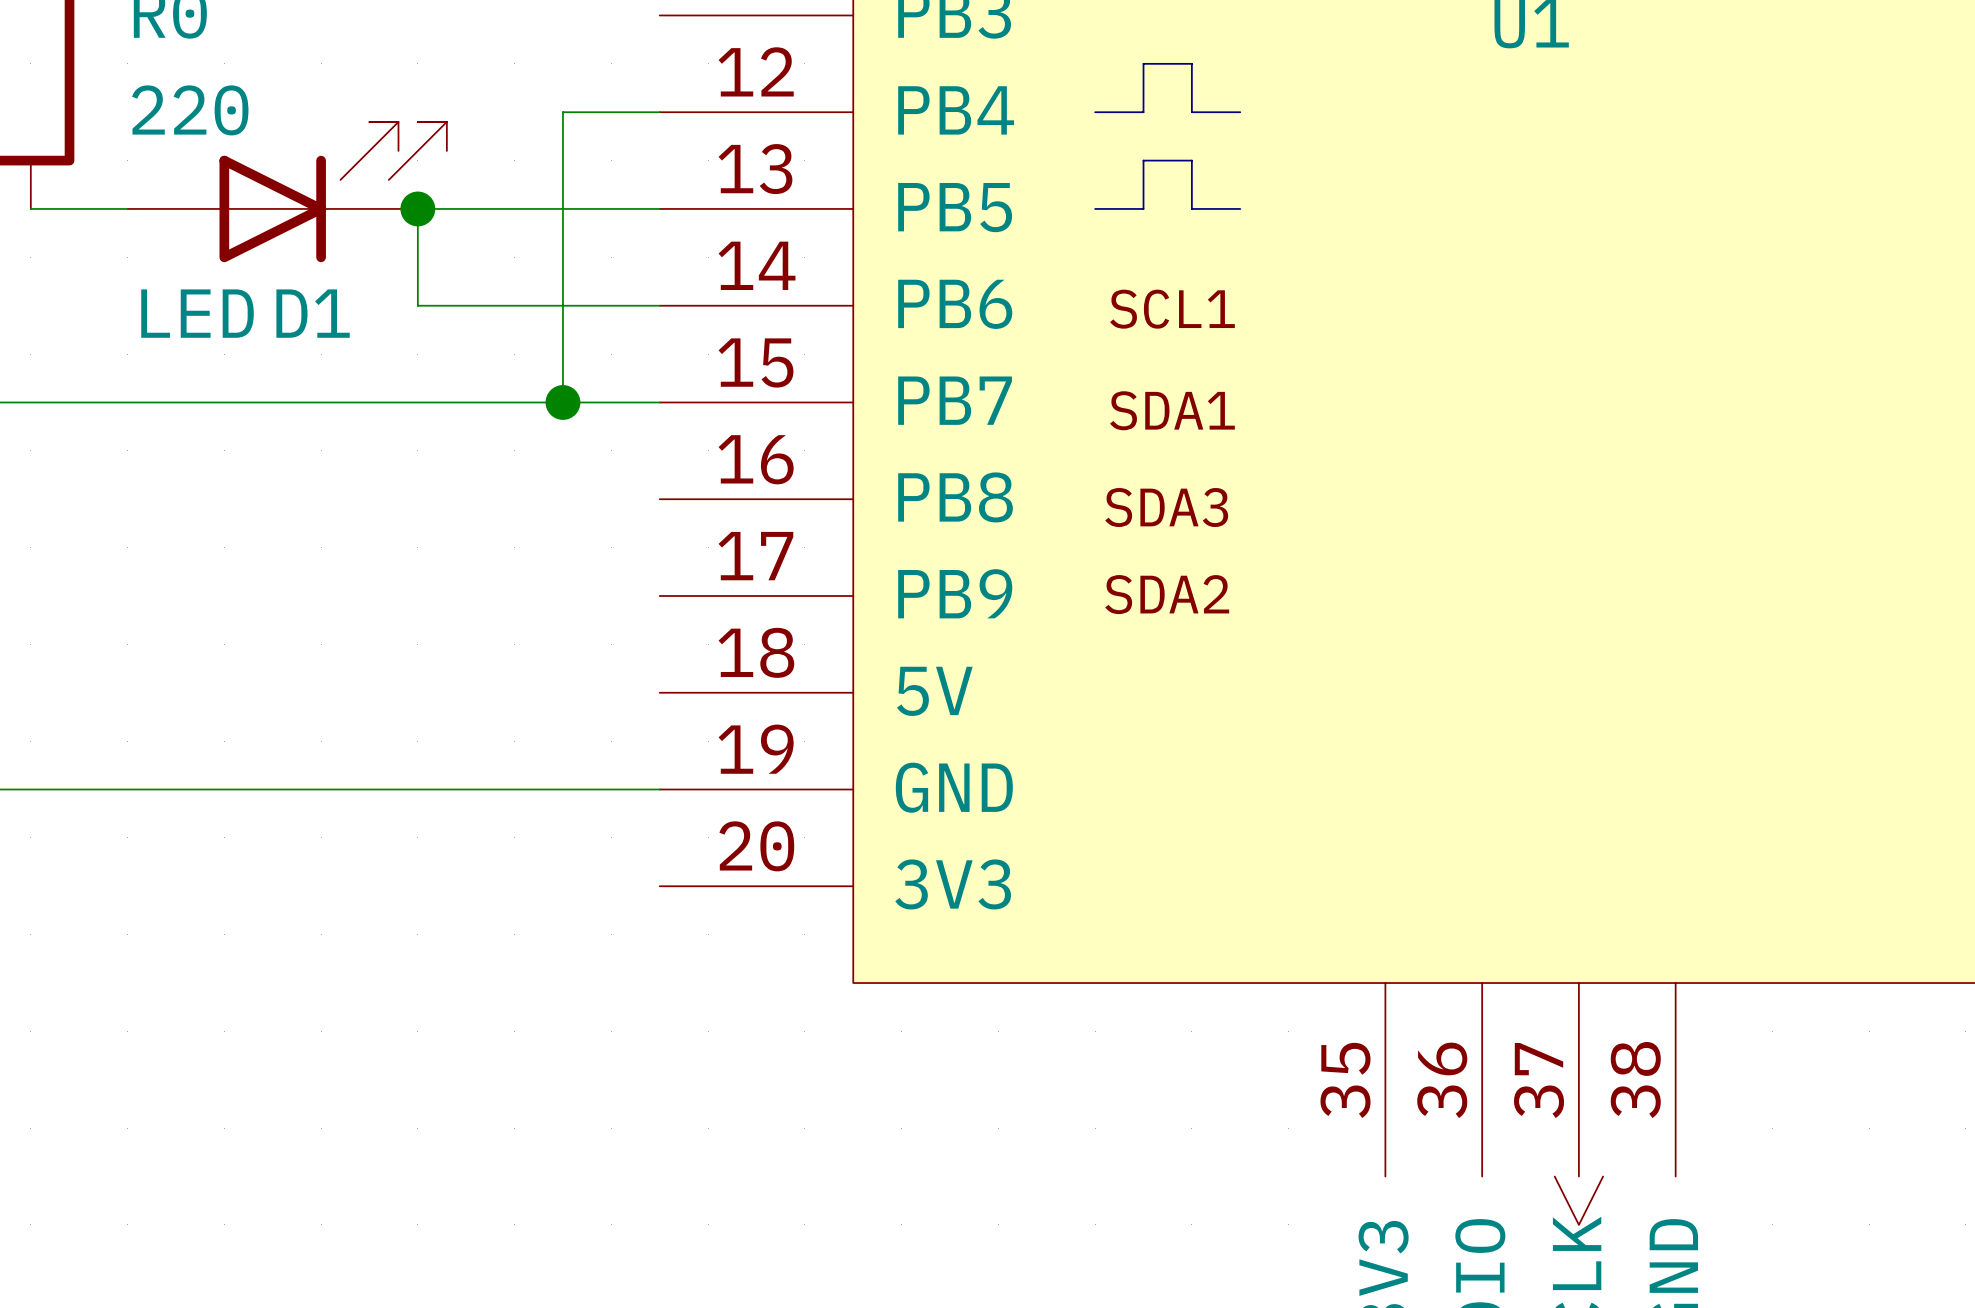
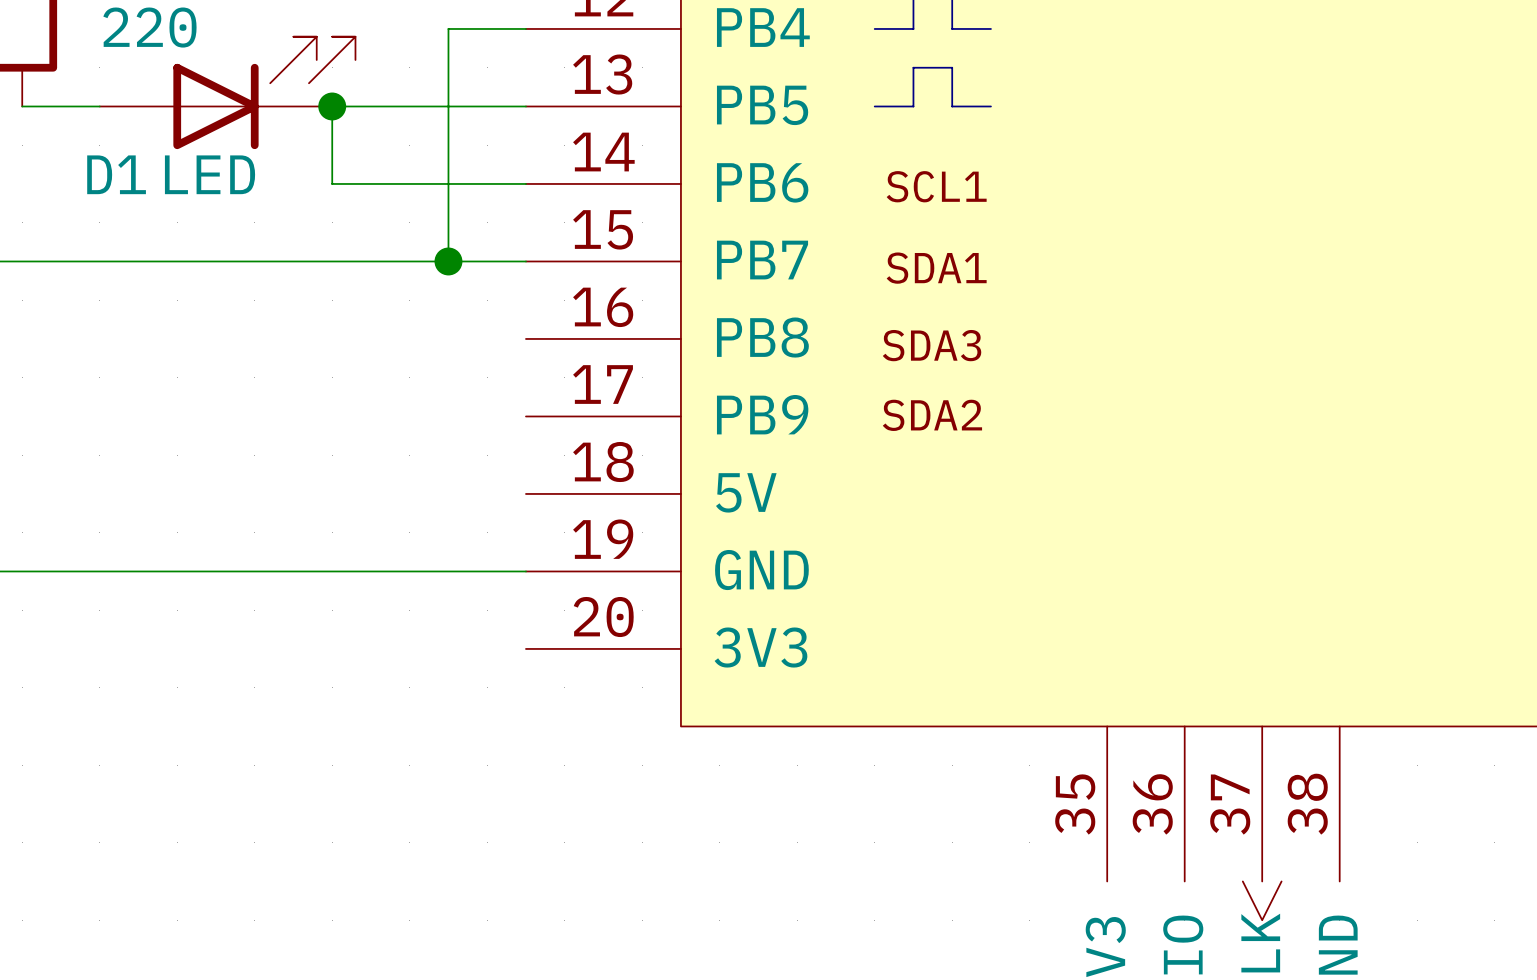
D1 value position: LED (197, 313) -> LED (210, 174)
D1 name position: D1 (313, 313) -> D1 (116, 174)

